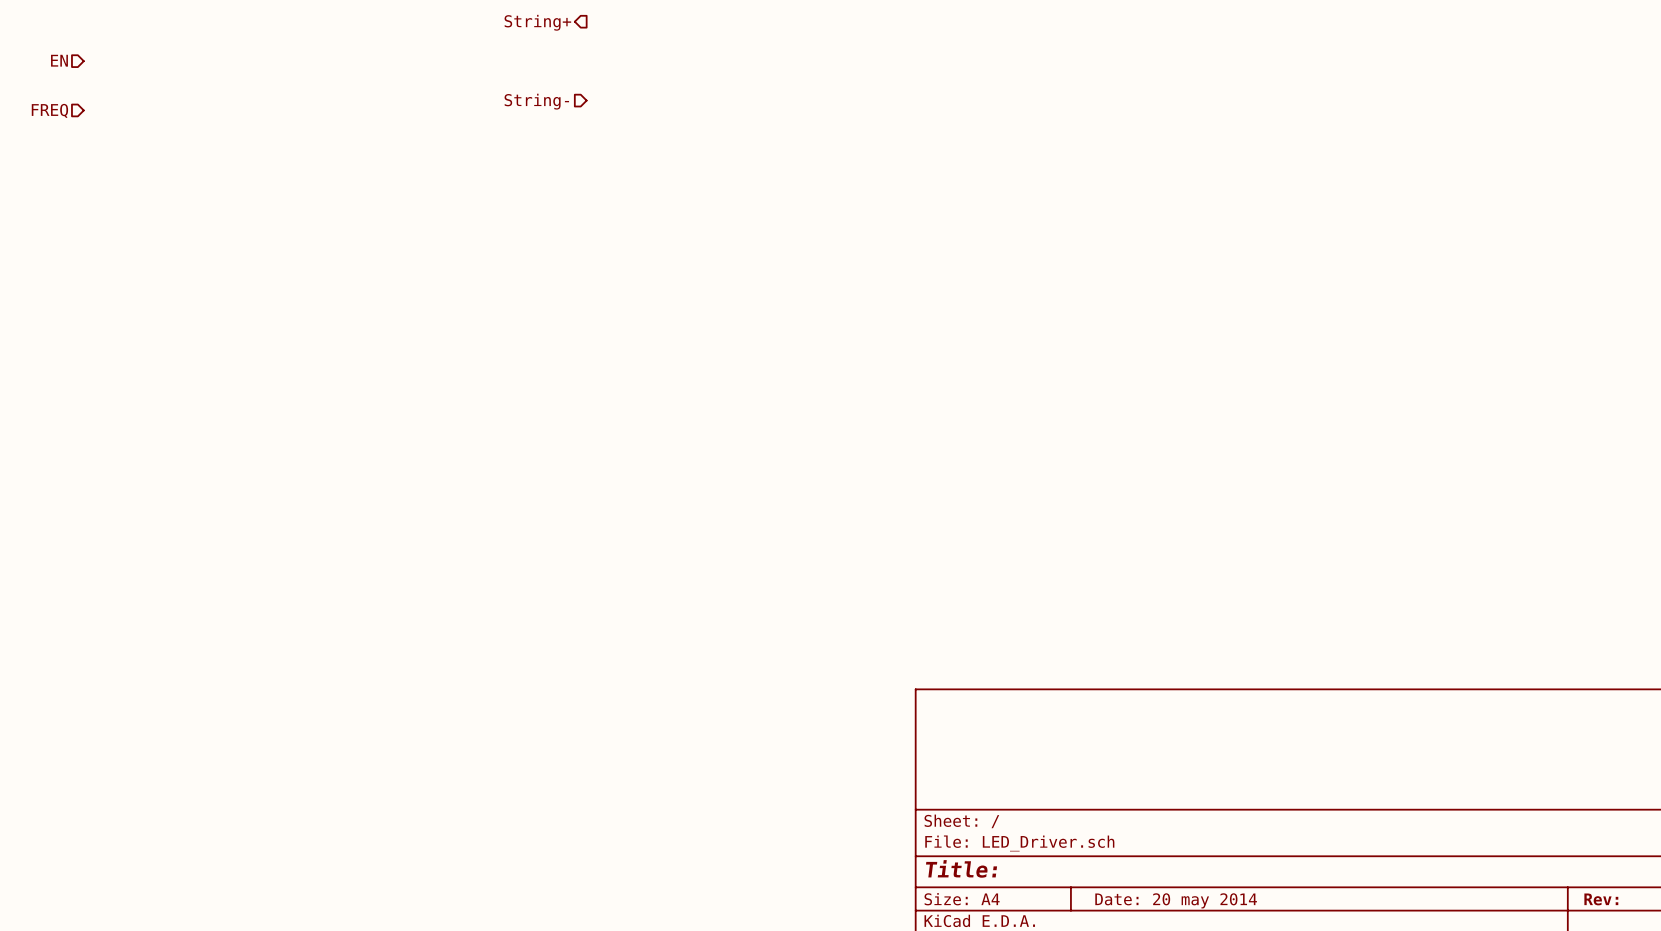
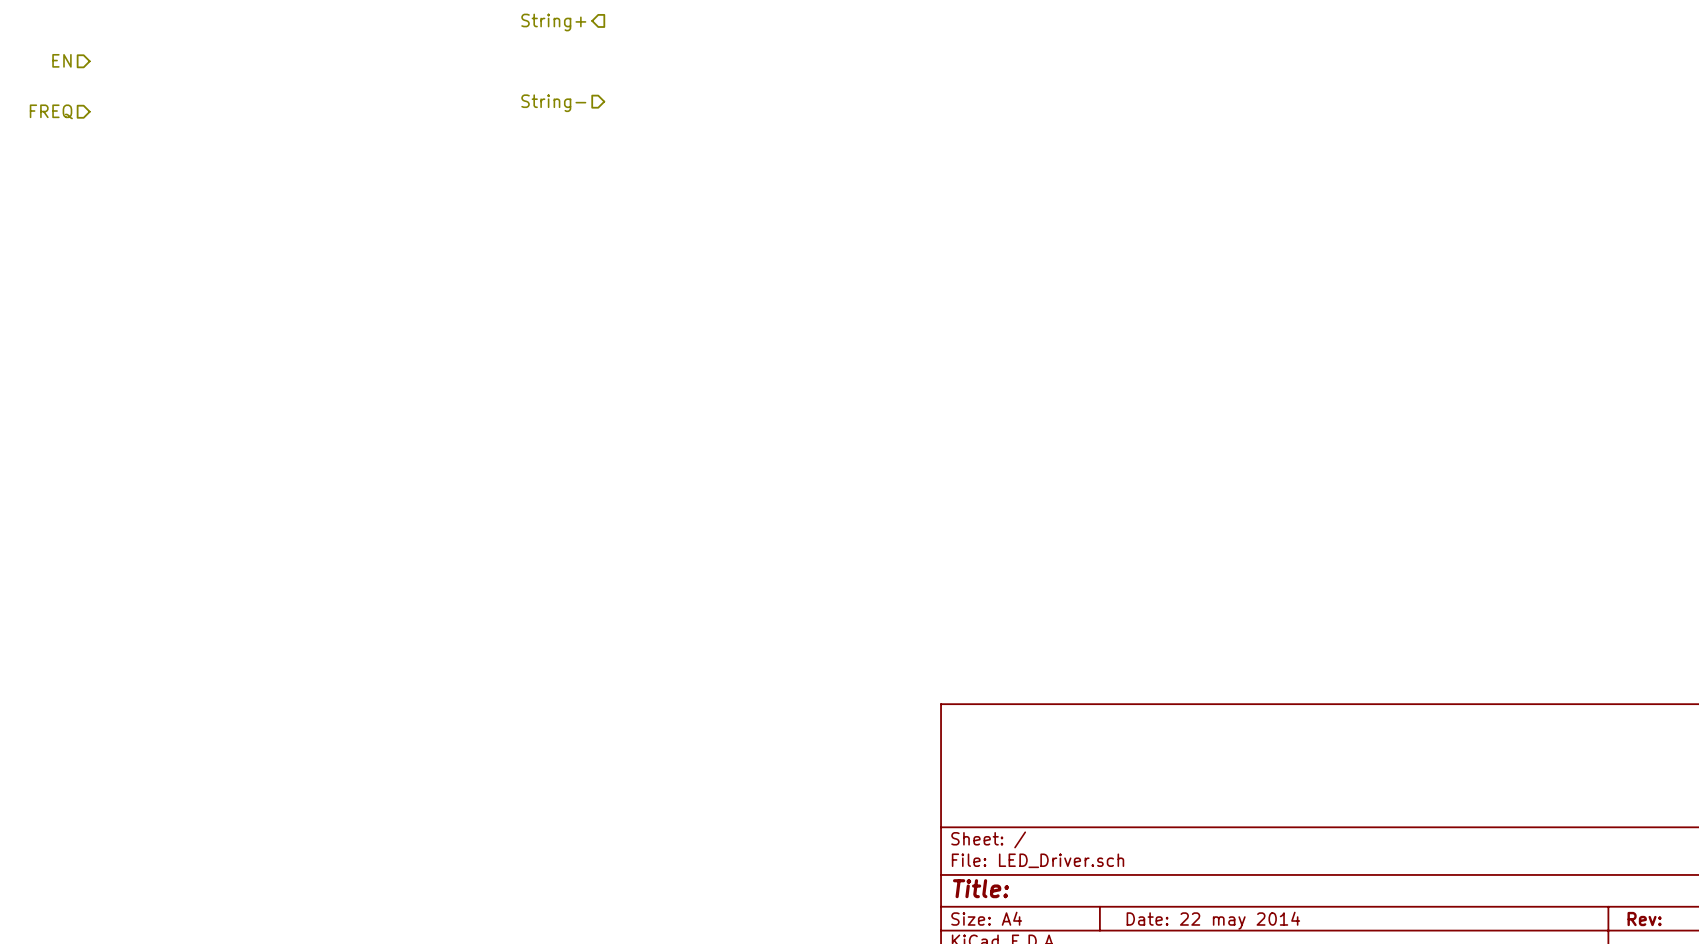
title block: Date: 20 may 2014 (1176, 900) -> Date: 22 may 2014 (1213, 920)

